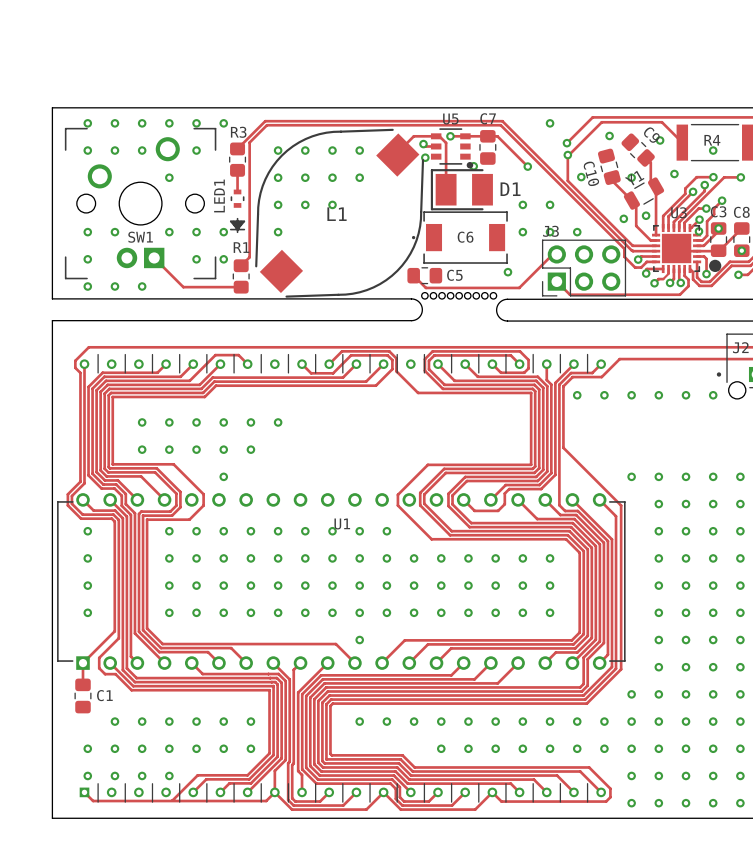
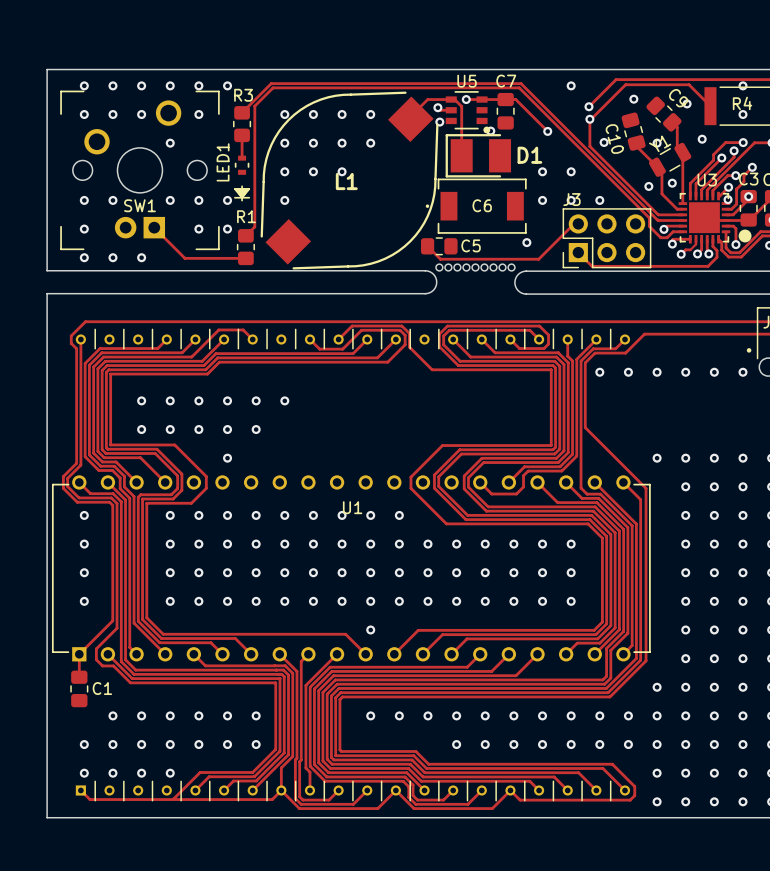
via: none -> (743, 85)

